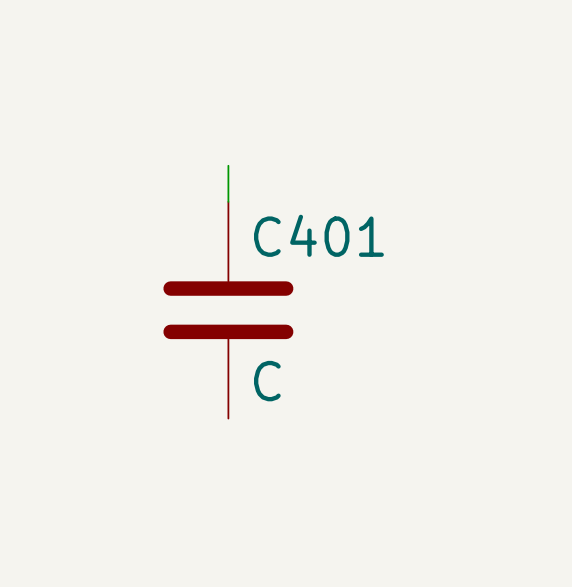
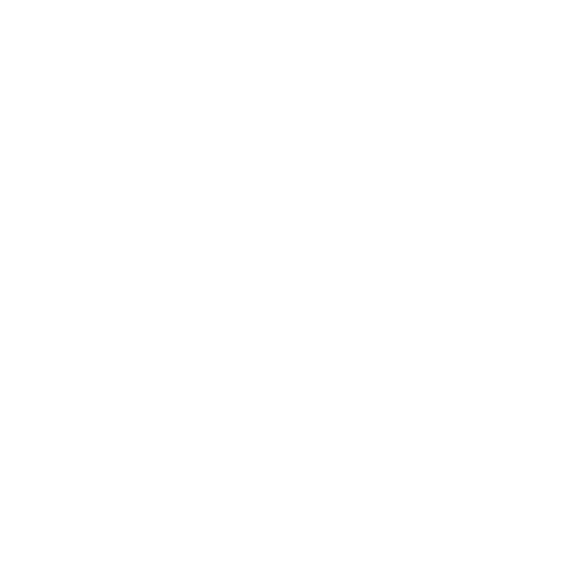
wire: (228, 165) (228, 201) -> none
C401: C (228, 310) -> none

